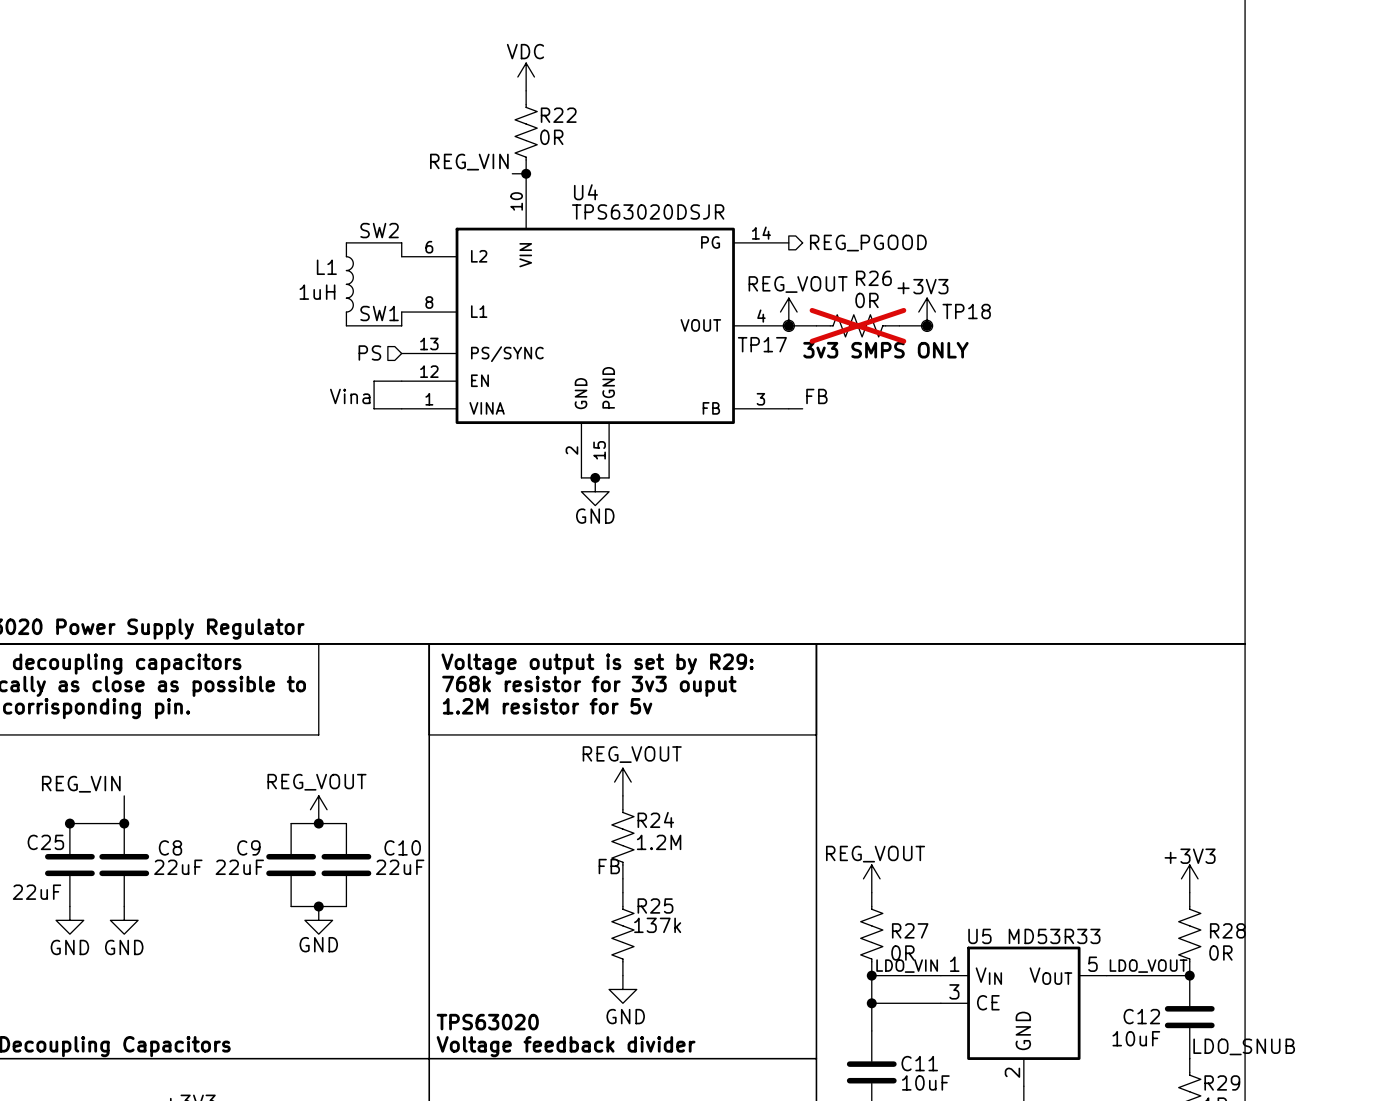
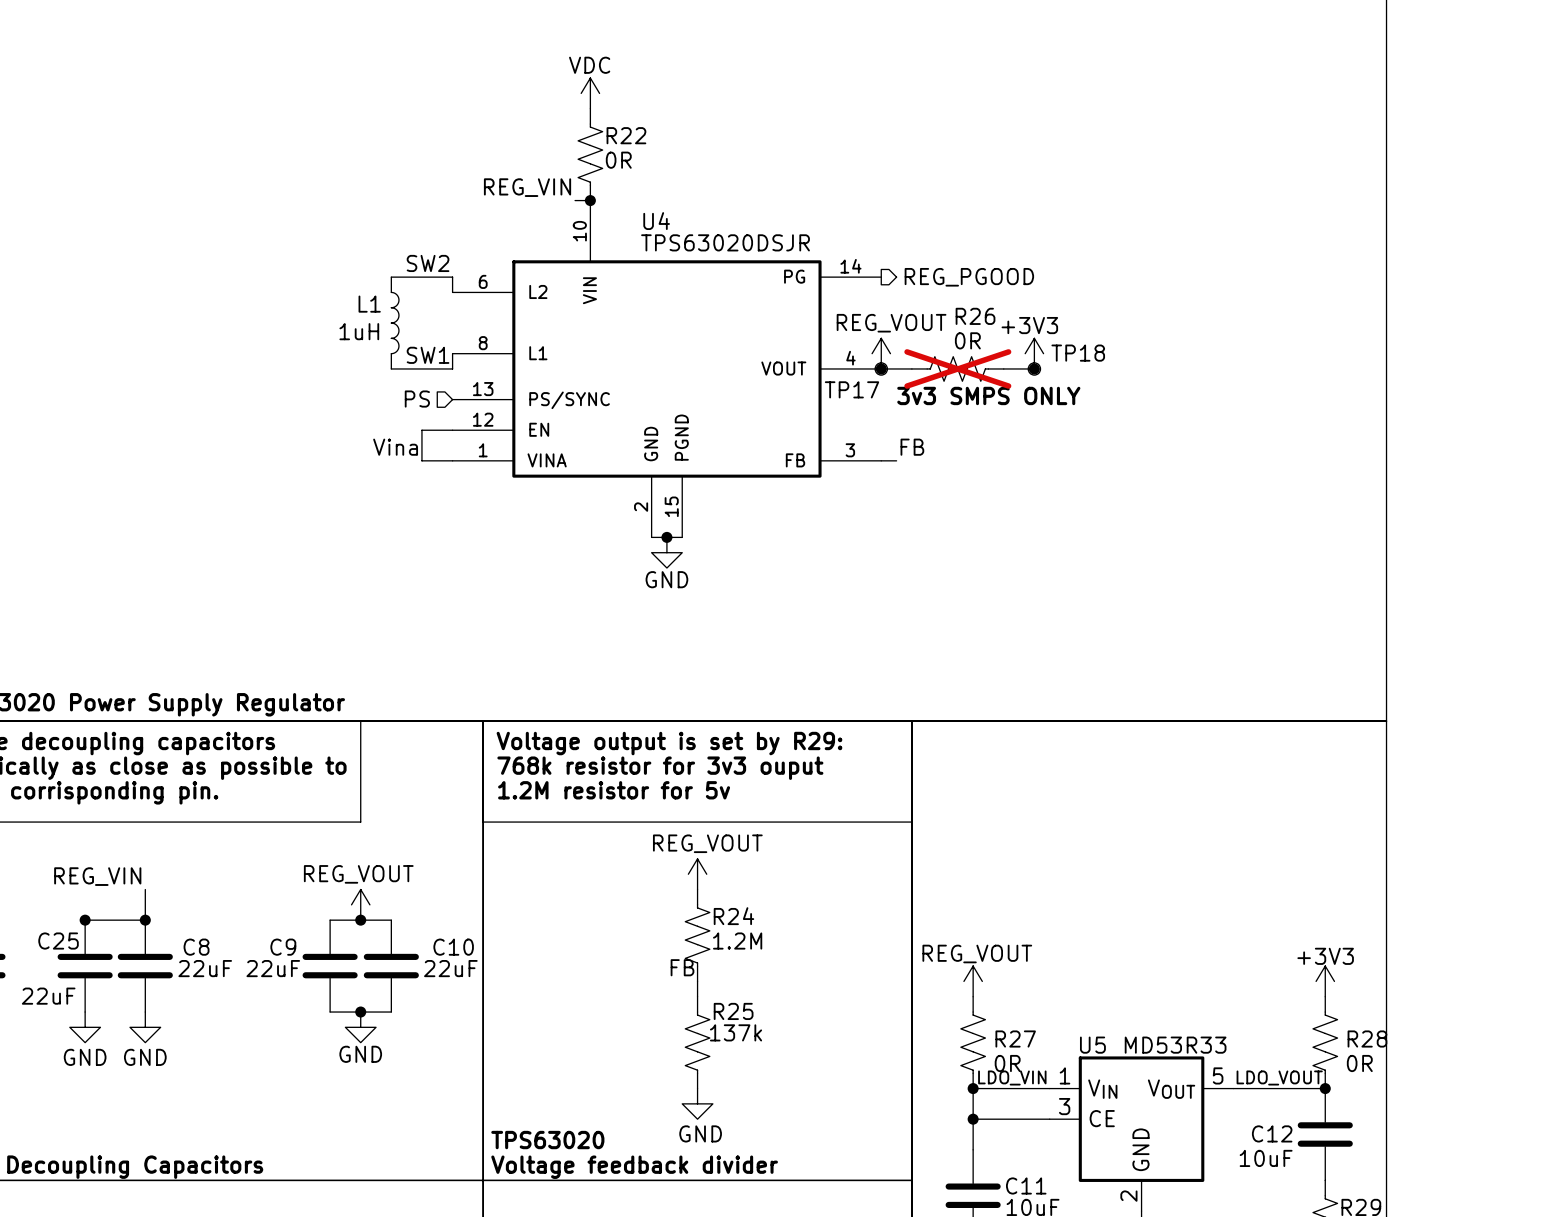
label: LDO_SNUB (1244, 1046) -> none

